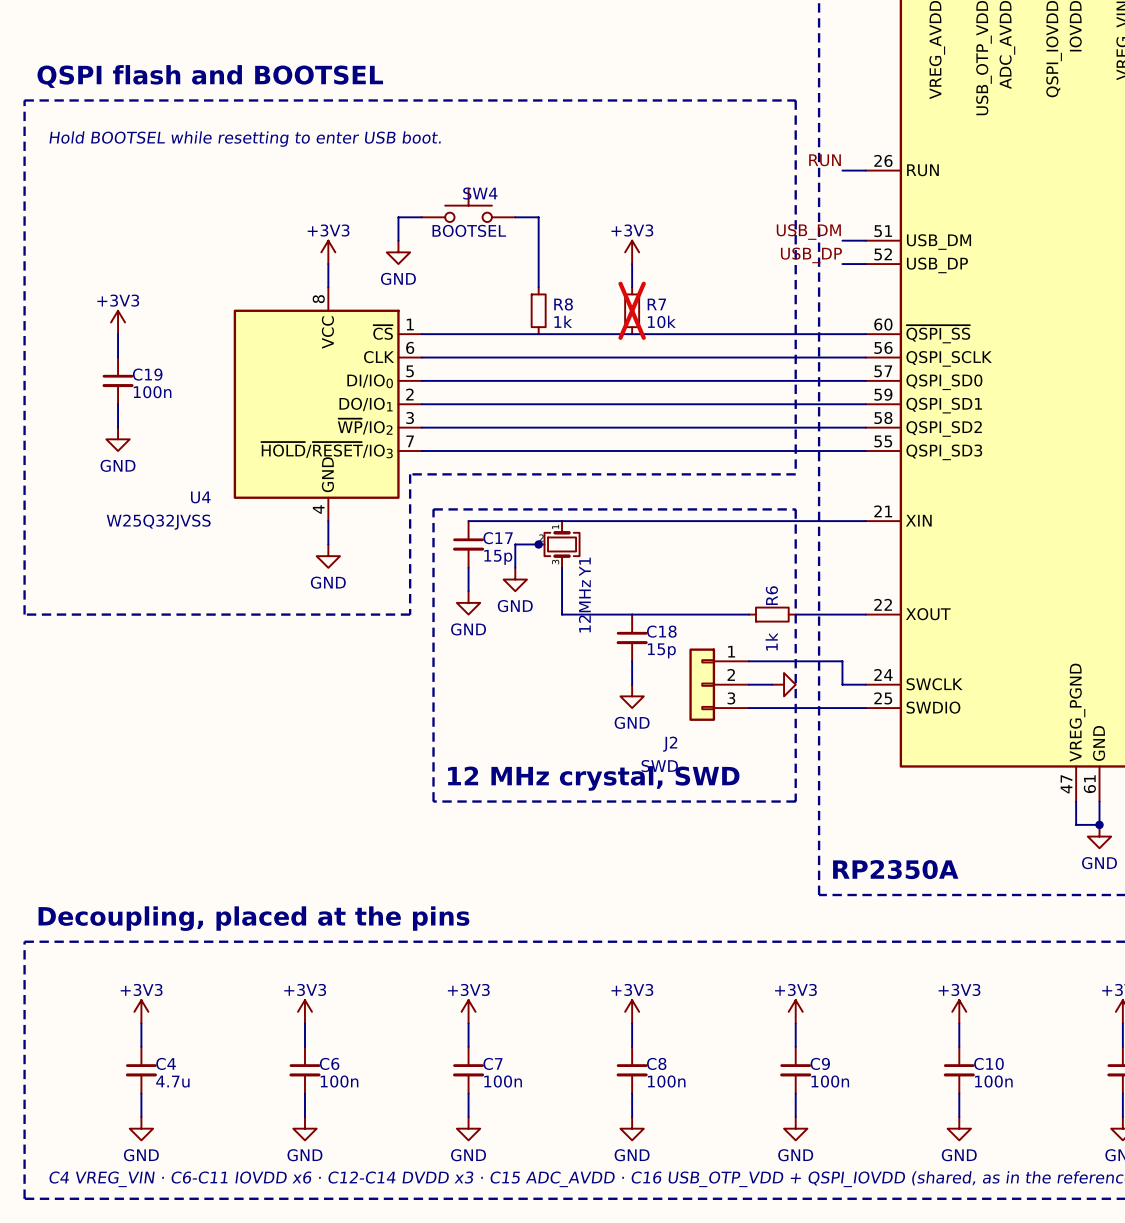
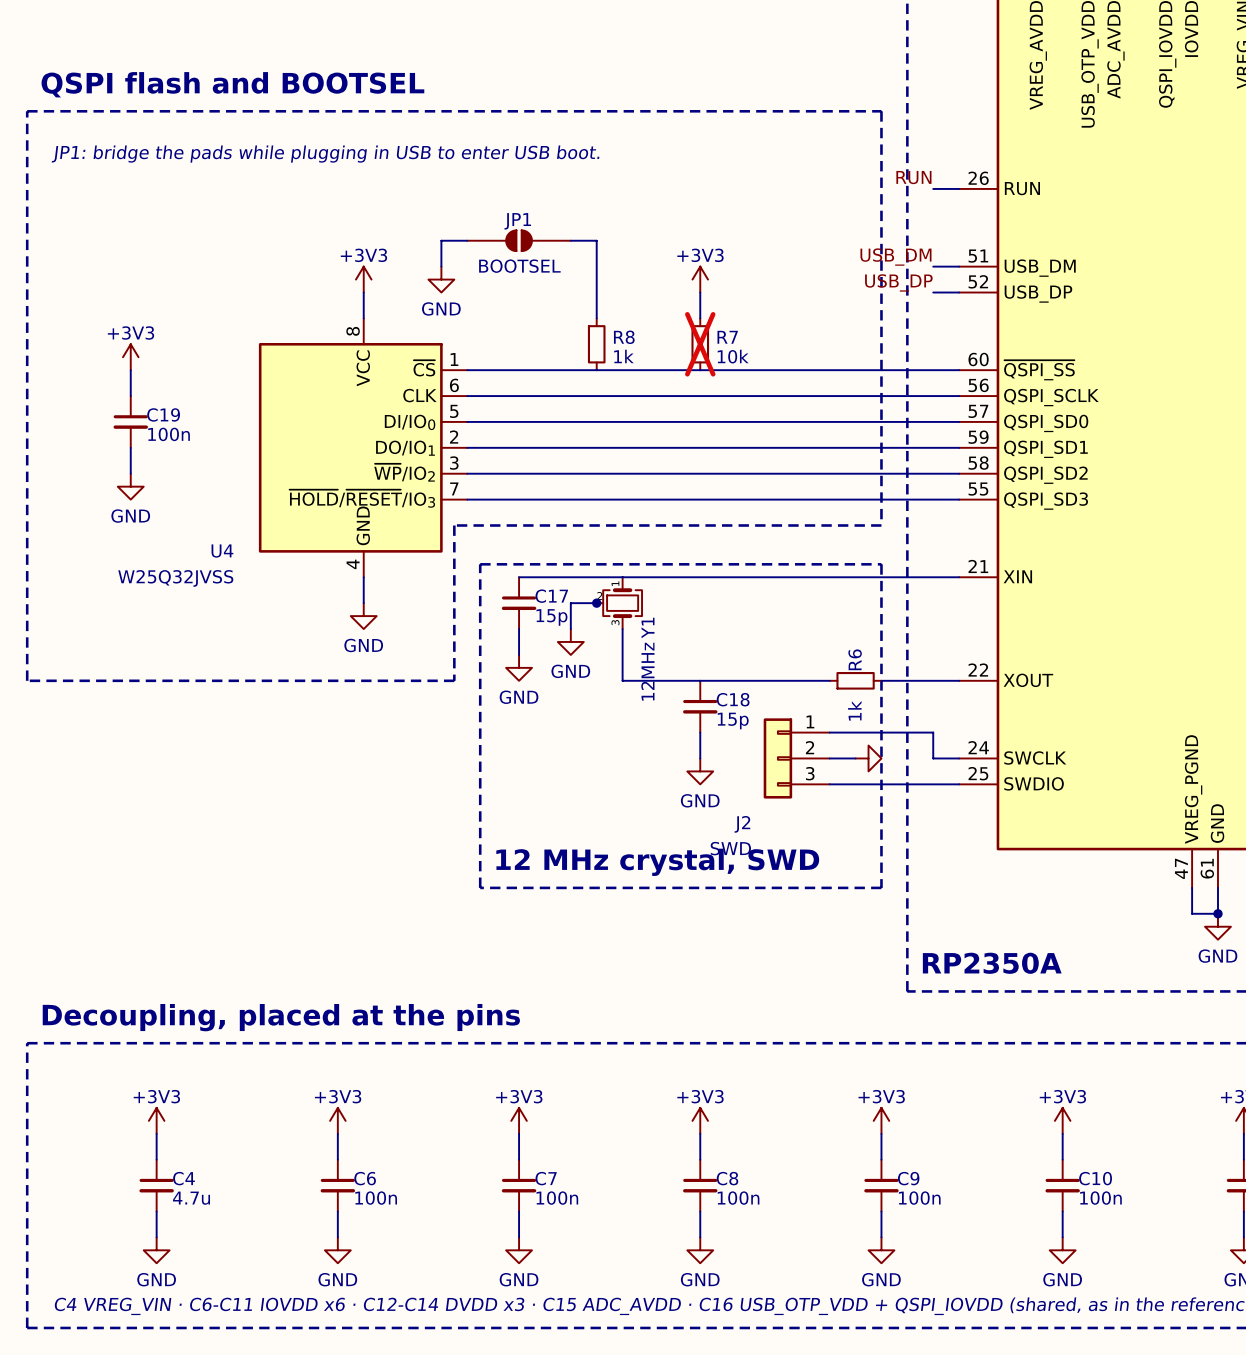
text: Hold BOOTSEL while resetting to enter USB boot. (245, 139) -> JP1: bridge the pads while plugging in USB to enter USB boot. (325, 154)
SW4: BOOTSEL (468, 205) -> none
JP1: none -> BOOTSEL (519, 240)

